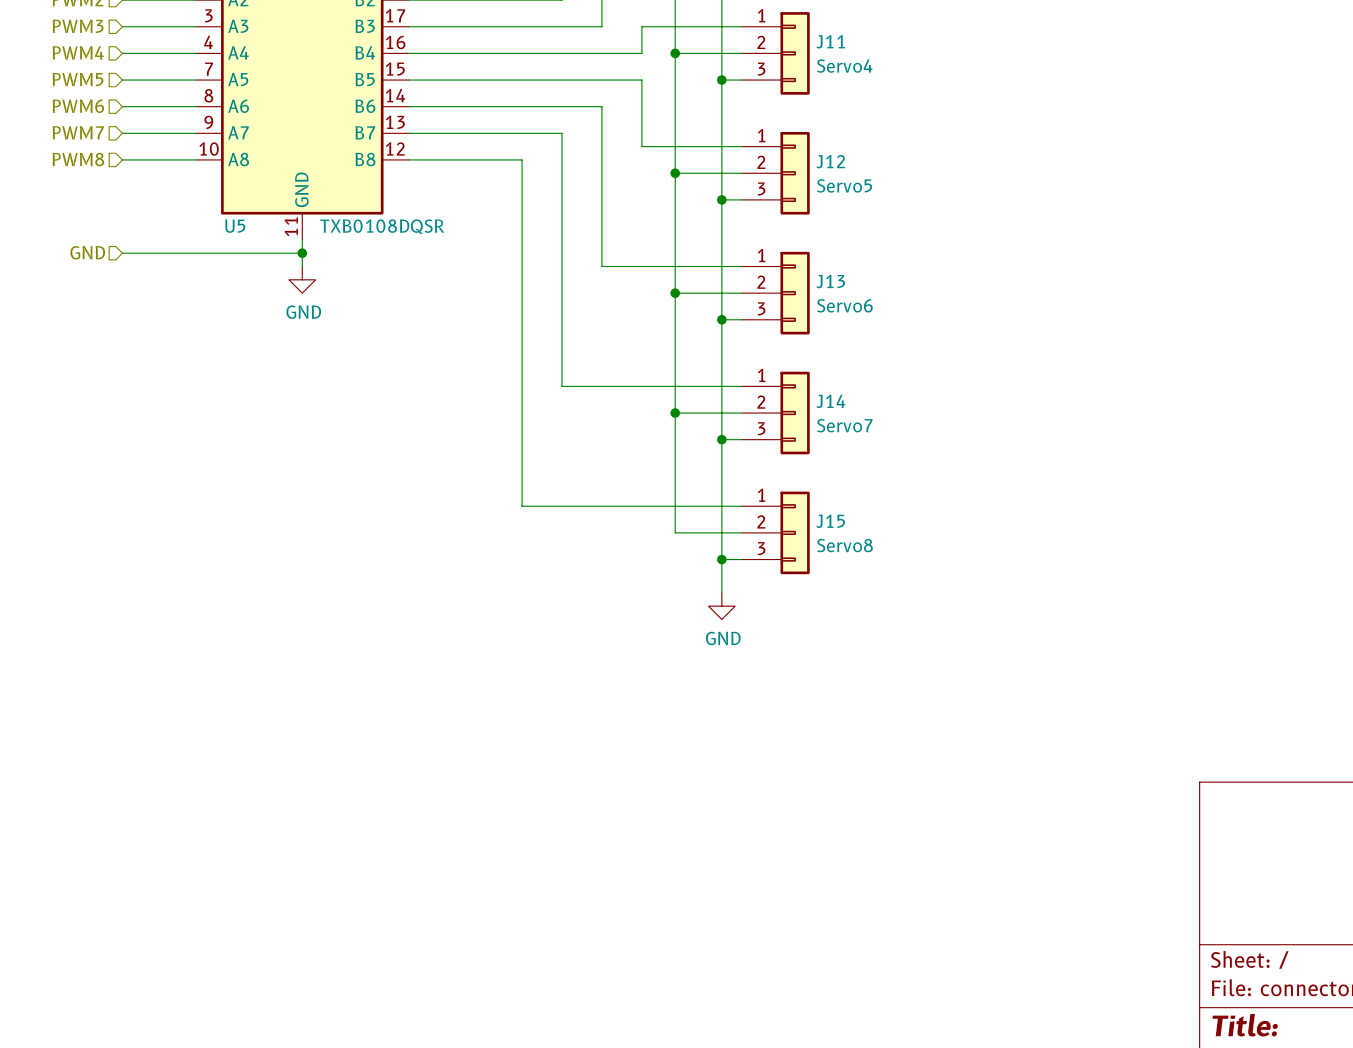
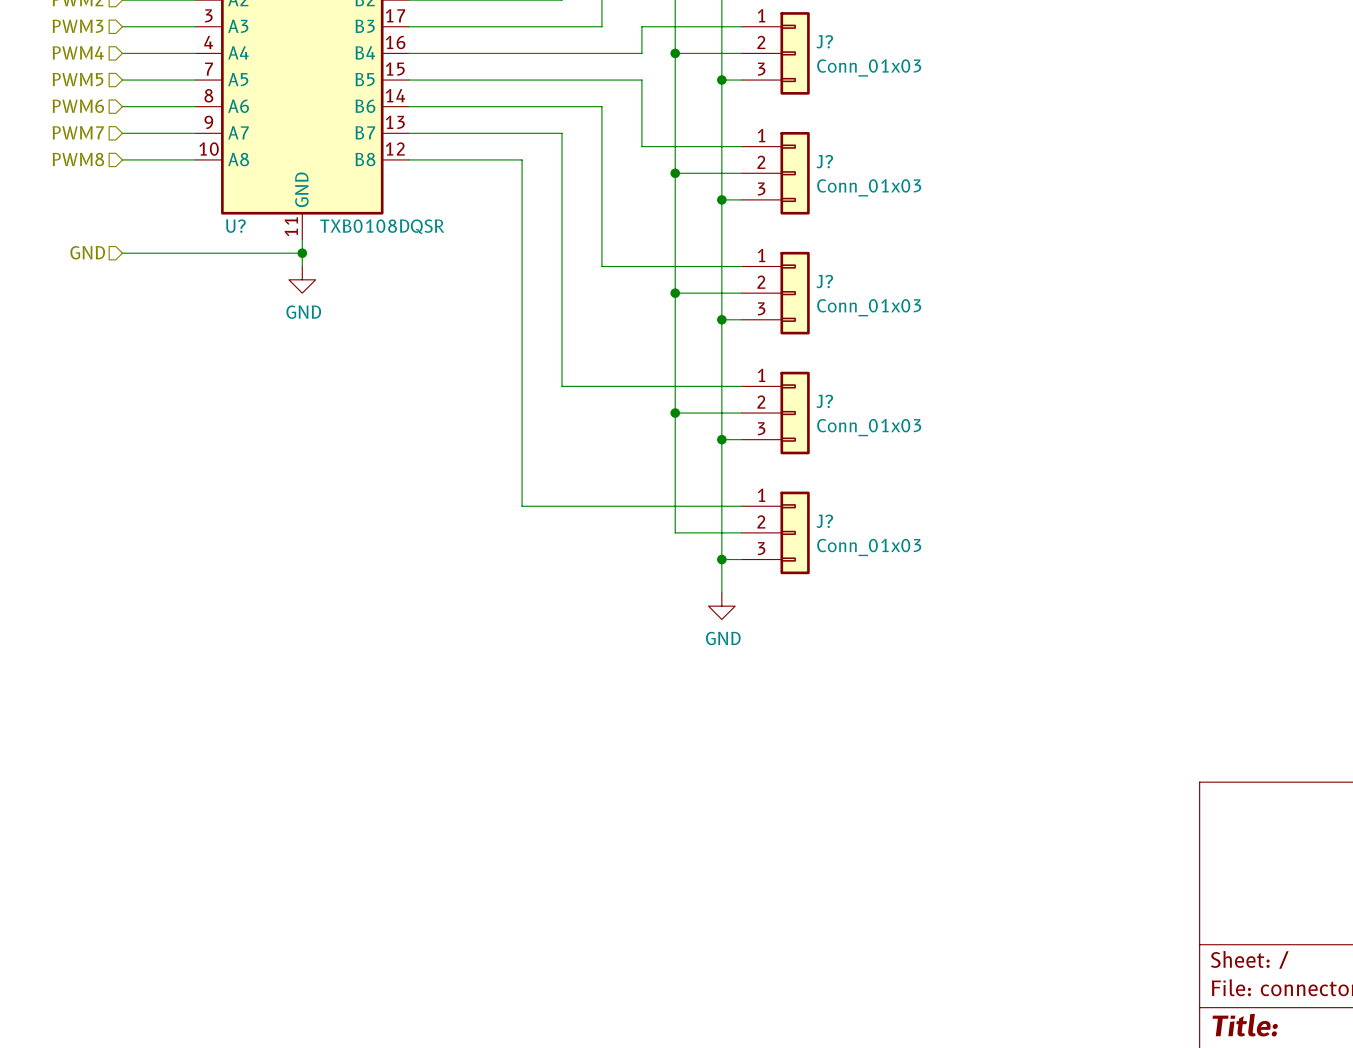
J11 name: J11 (830, 41) -> J? (824, 41)
J11 value: Servo4 (844, 66) -> Conn_01x03 (869, 67)
J12 name: J12 (830, 161) -> J? (824, 161)
J12 value: Servo5 (844, 185) -> Conn_01x03 (869, 187)
U5 name: U5 (235, 226) -> U? (235, 226)
J13 name: J13 (830, 281) -> J? (824, 281)
J13 value: Servo6 (844, 305) -> Conn_01x03 (869, 307)
J14 name: J14 (830, 401) -> J? (824, 401)
J14 value: Servo7 (844, 425) -> Conn_01x03 (869, 427)
J15 name: J15 (830, 521) -> J? (824, 521)
J15 value: Servo8 (844, 545) -> Conn_01x03 (869, 547)

